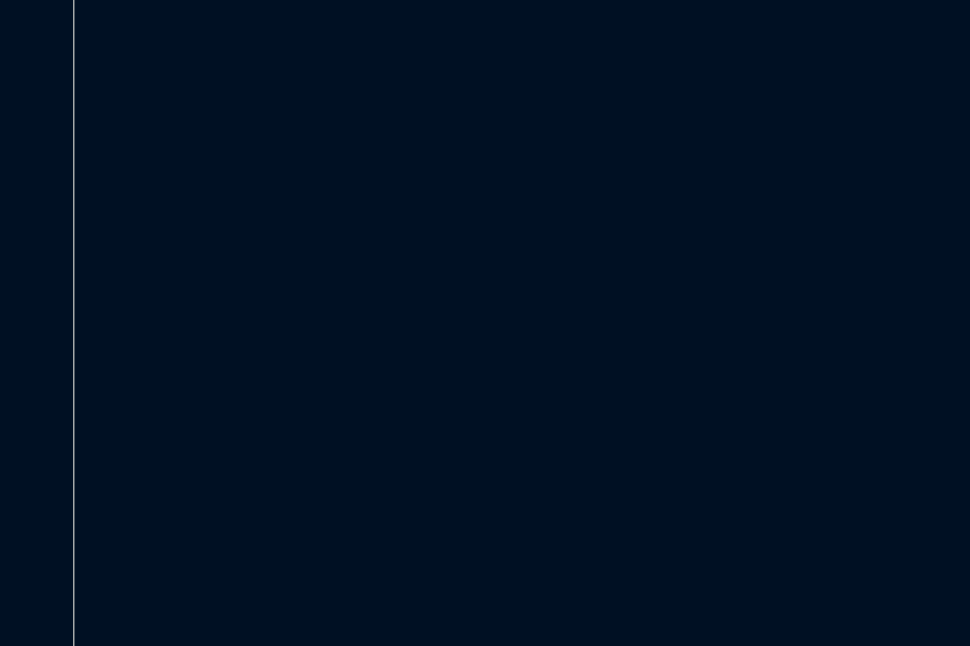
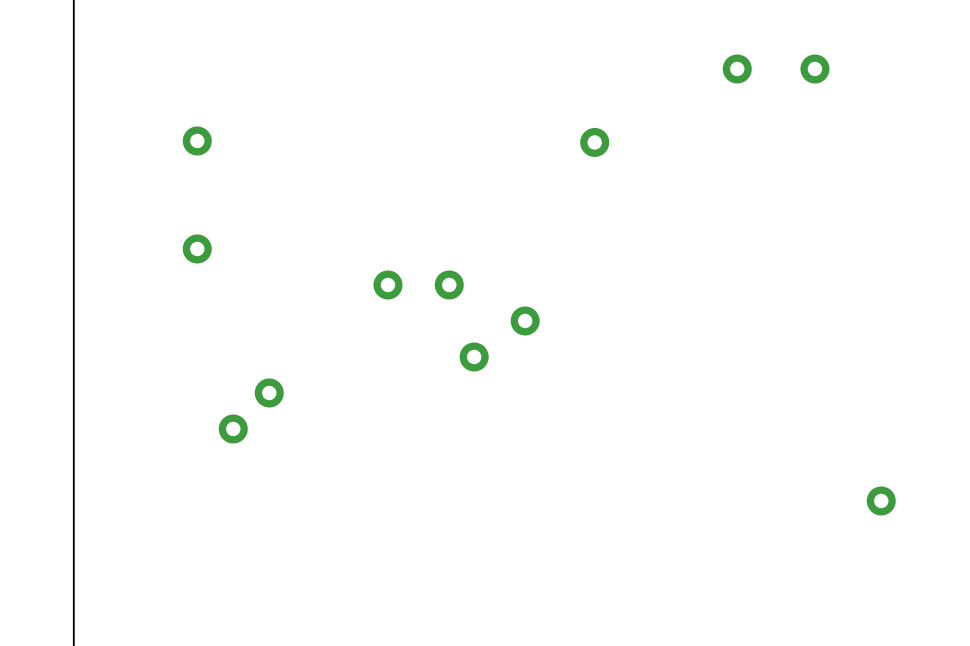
via: none -> (737, 68)
via: none -> (814, 68)
via: none -> (197, 140)
via: none -> (594, 142)
via: none -> (197, 248)
via: none -> (387, 284)
via: none -> (449, 284)
via: none -> (525, 320)
via: none -> (474, 356)
via: none -> (269, 392)
via: none -> (233, 428)
via: none -> (881, 500)

